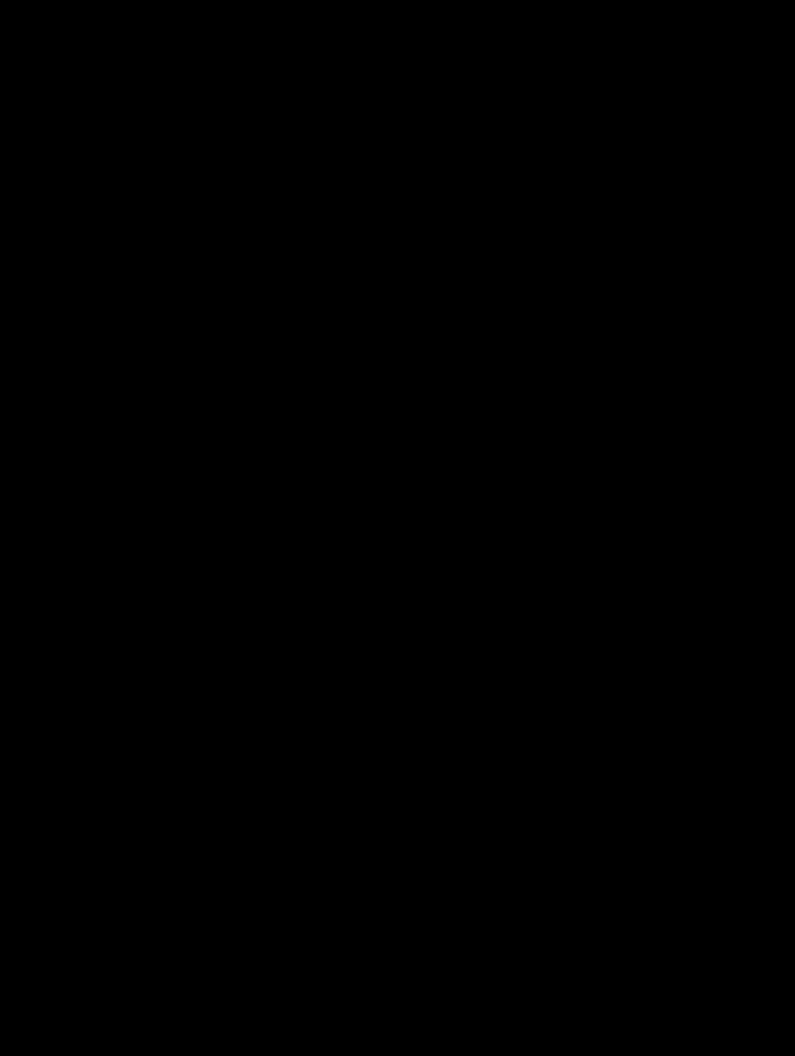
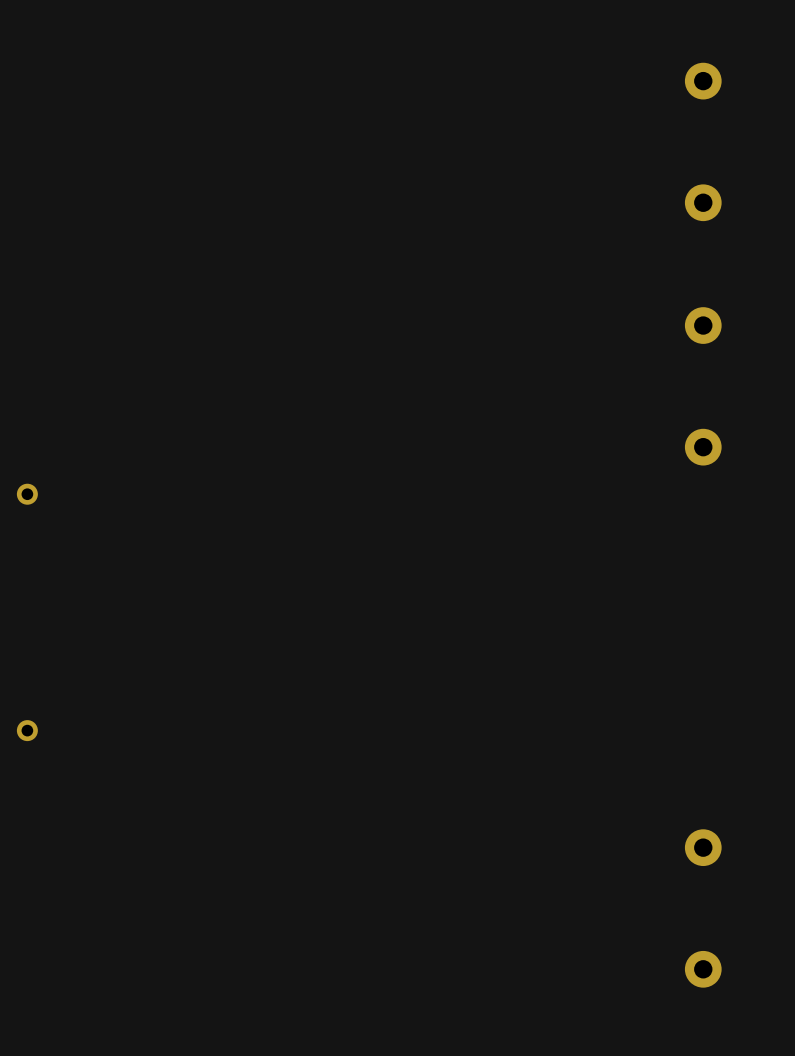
via: none -> (703, 81)
via: none -> (703, 202)
via: none -> (703, 325)
via: none -> (703, 447)
via: none -> (27, 494)
via: none -> (27, 730)
via: none -> (703, 847)
via: none -> (703, 969)

